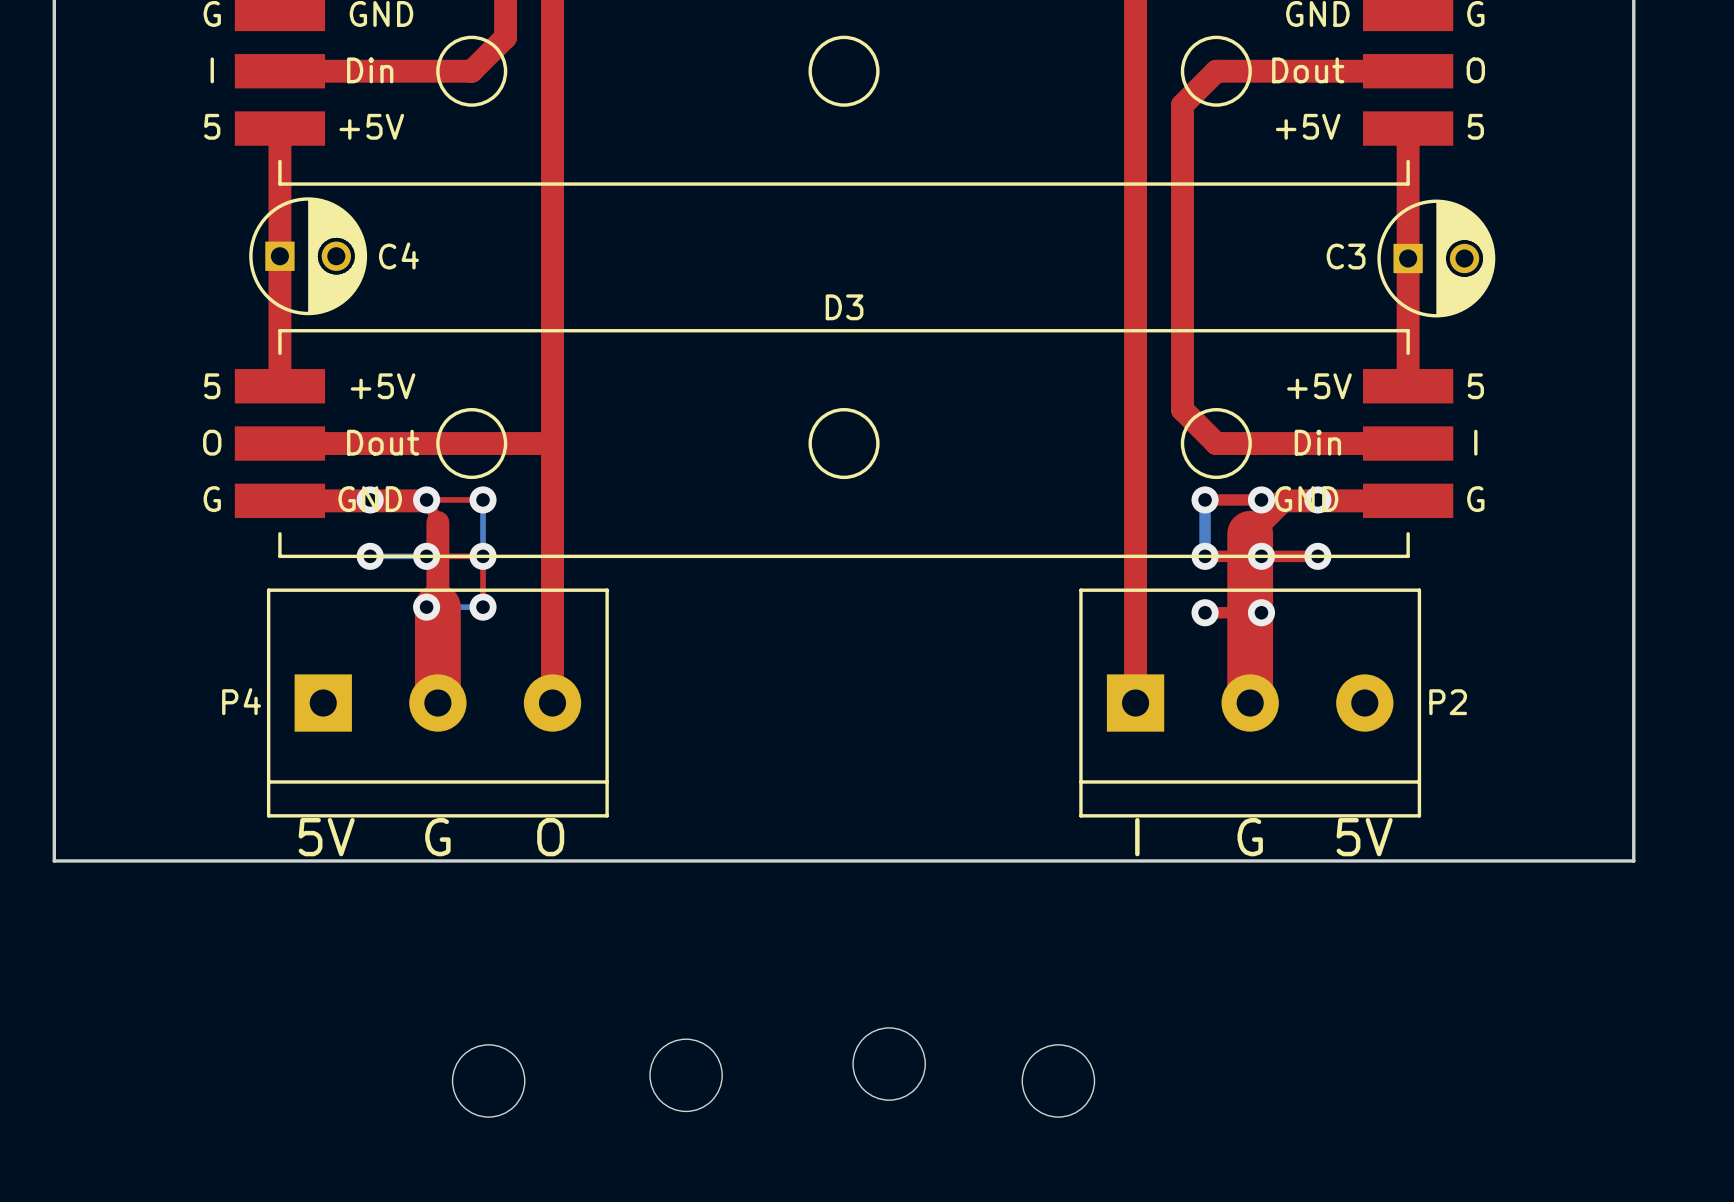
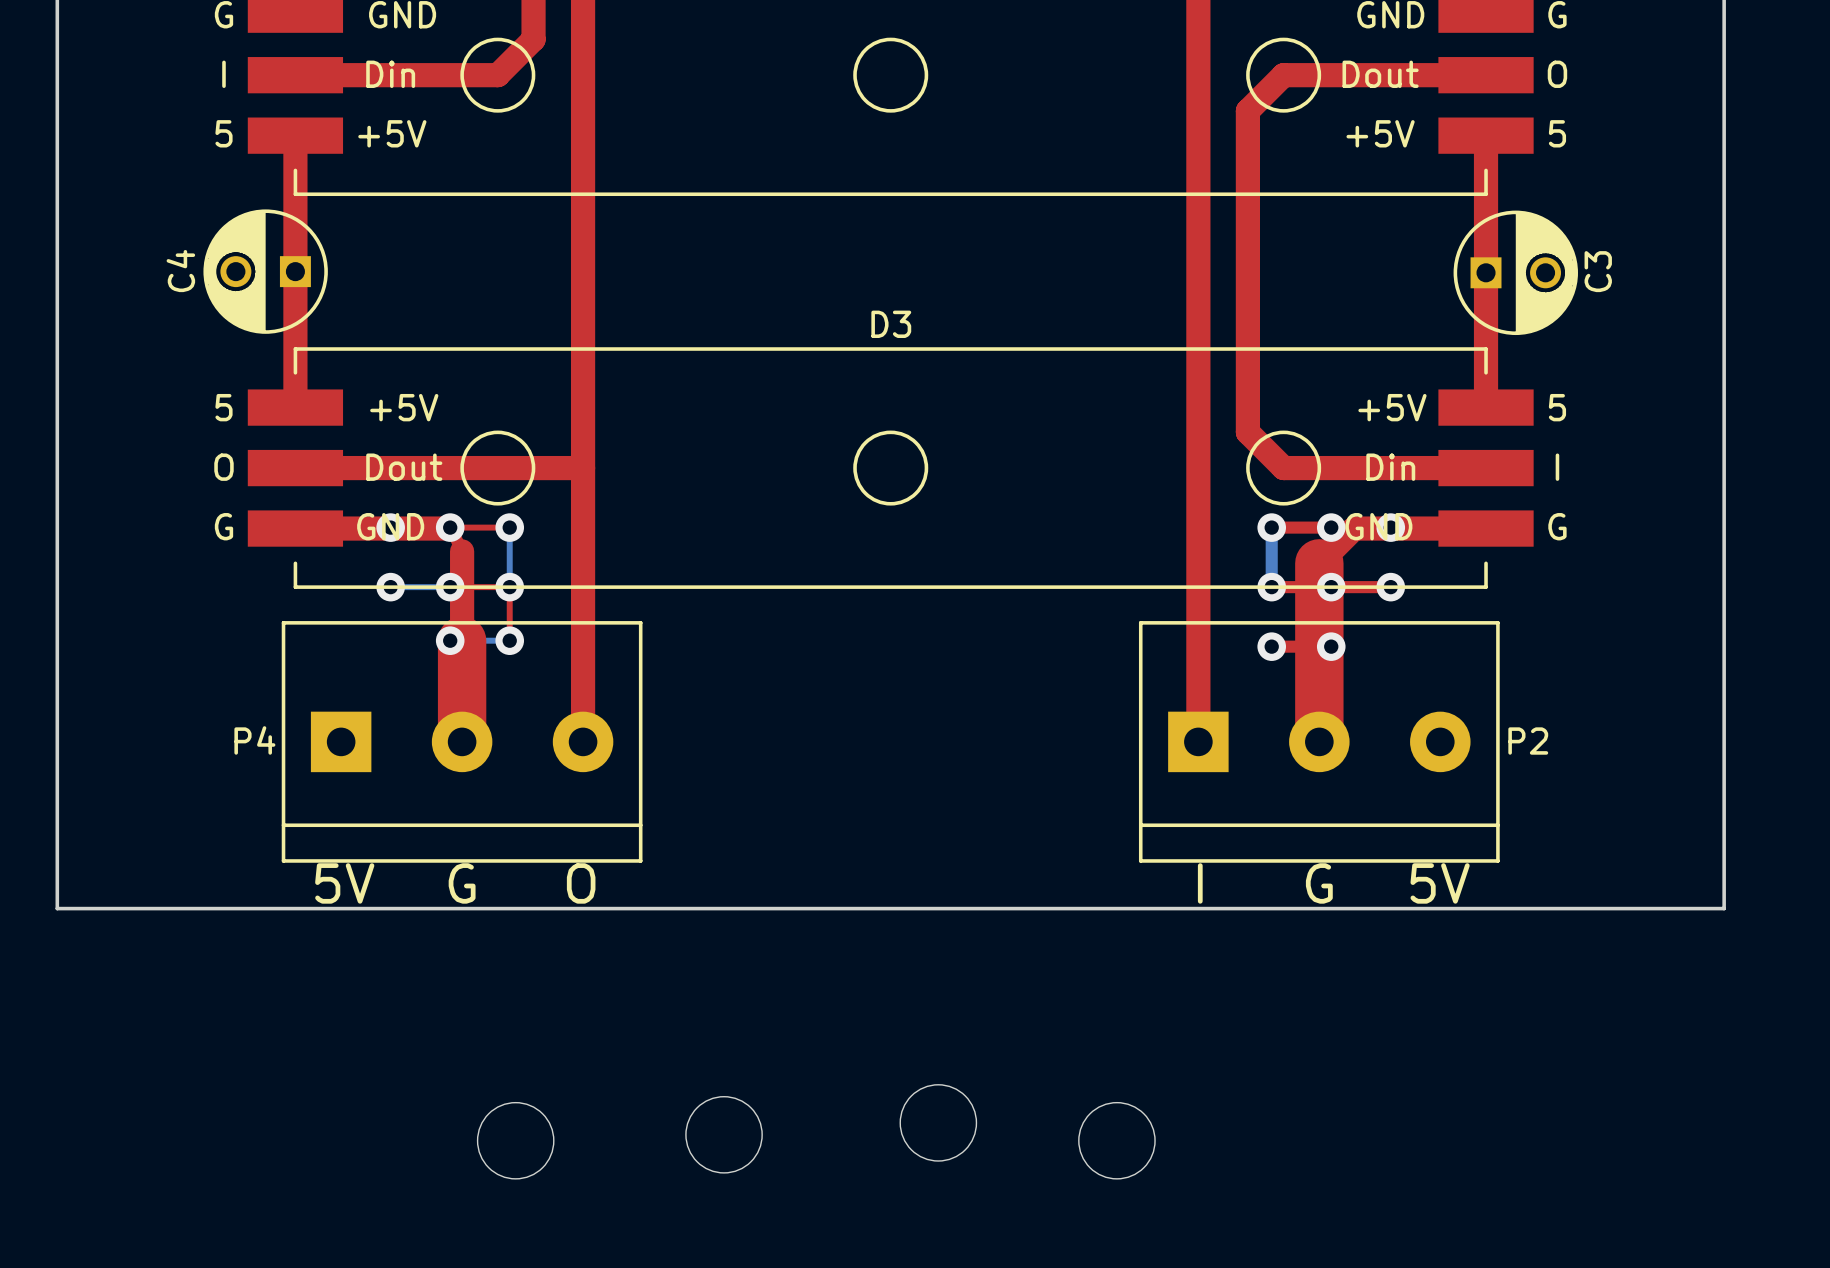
C4 rotation: 0° (308, 256) -> 180° (265, 271)
C3 name rotation: 0° (1346, 256) -> 90° counterclockwise (1598, 271)
C3 name position: C3 (1346, 256) -> C3 (1598, 271)

